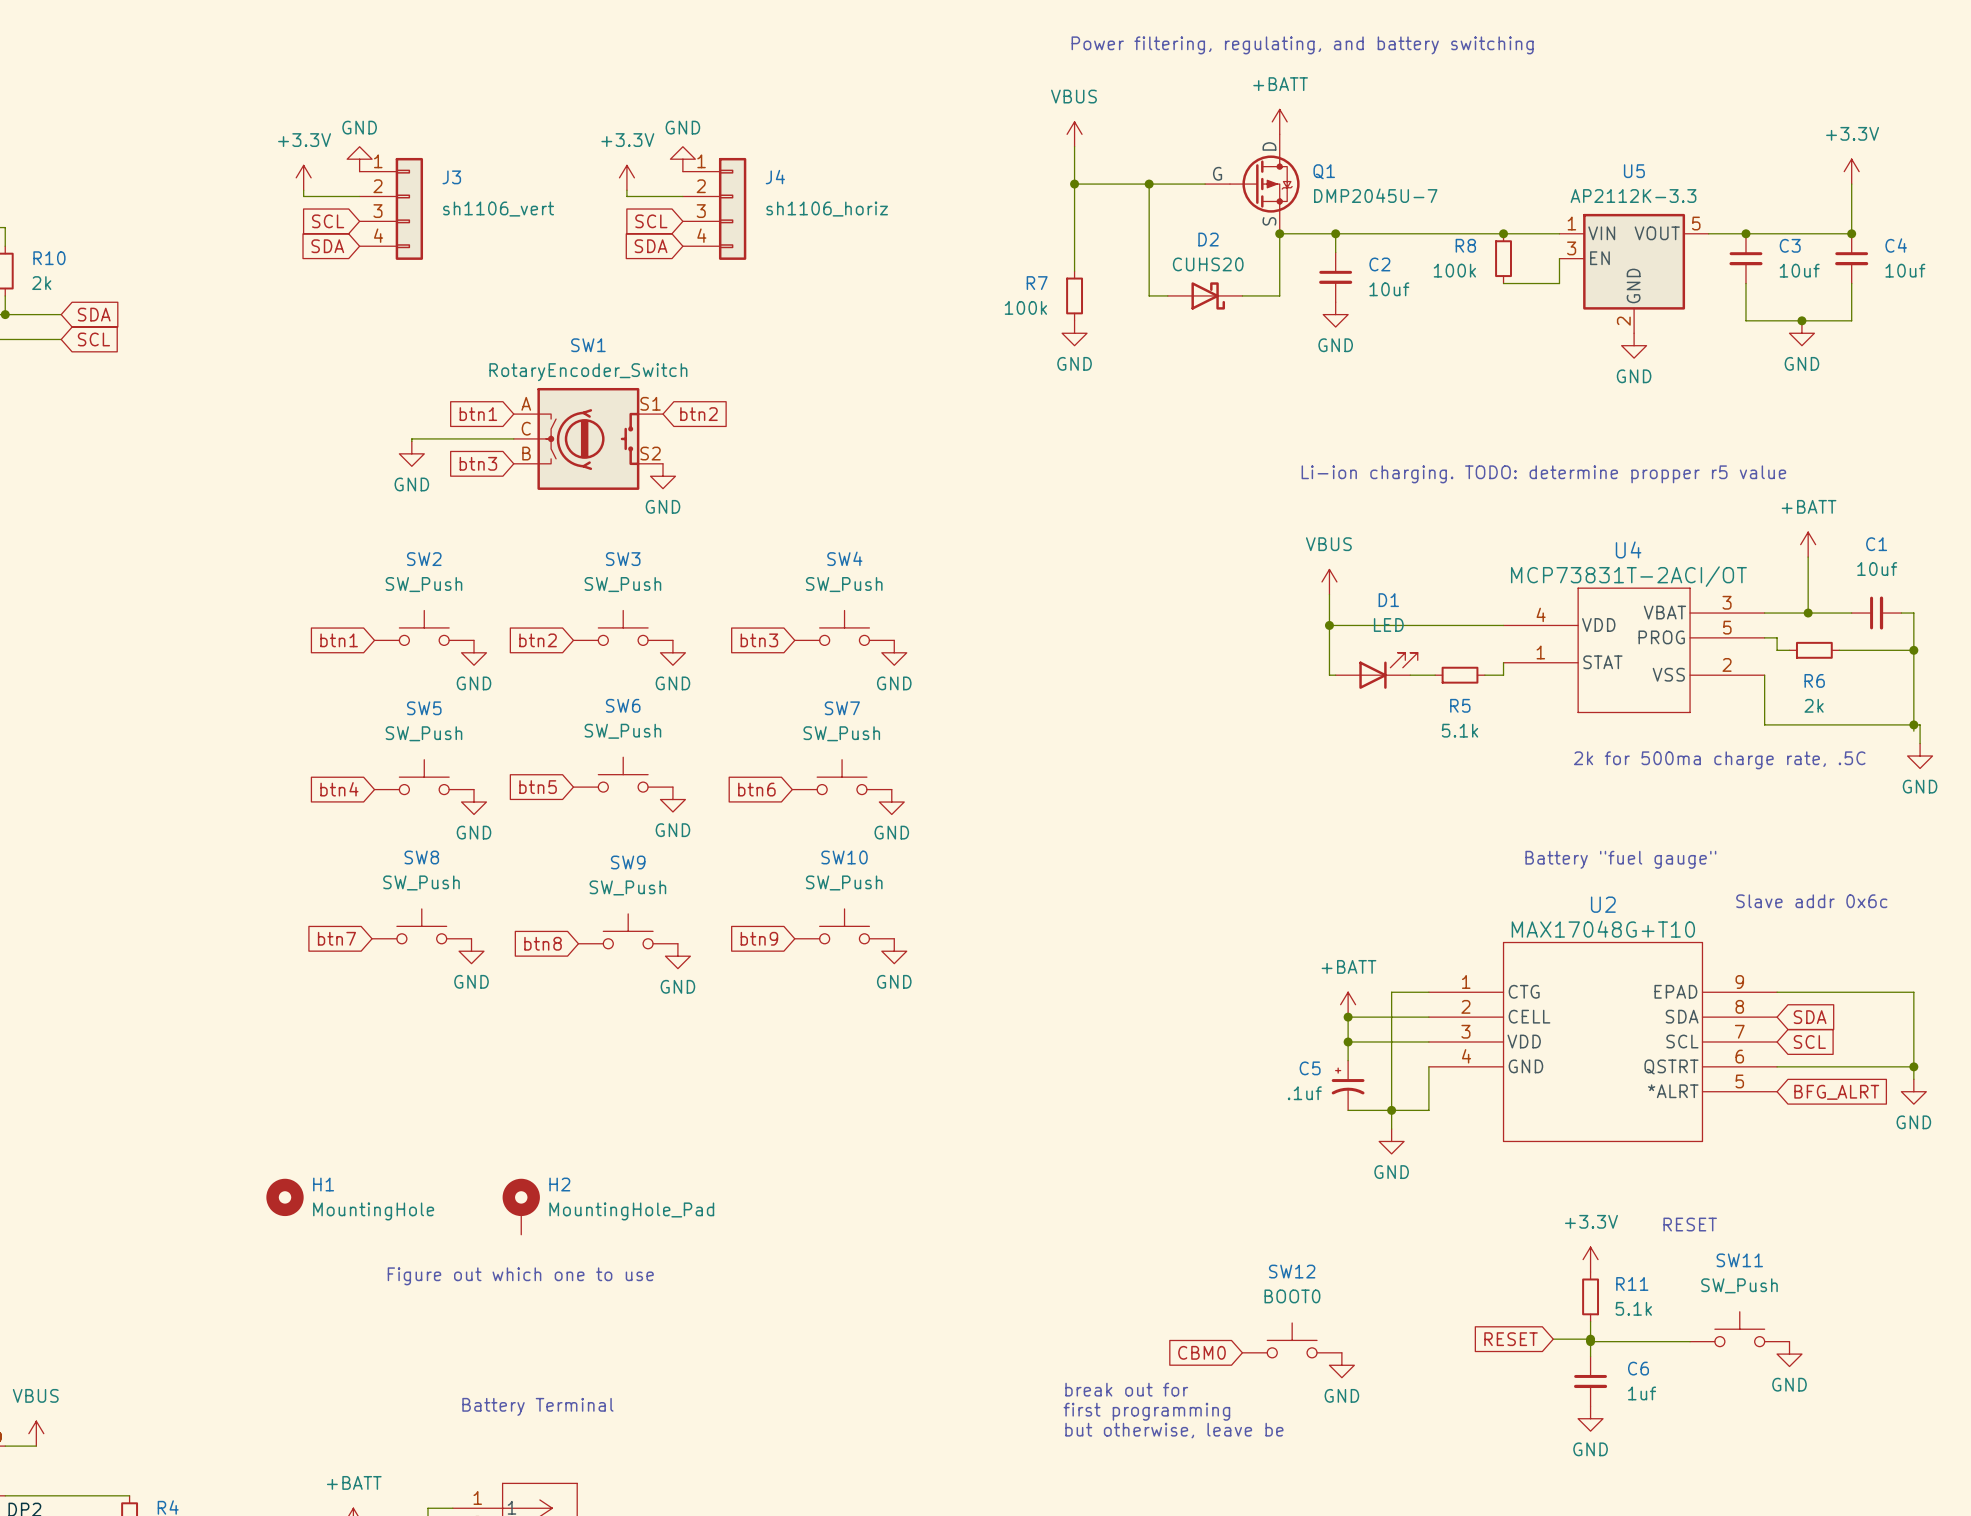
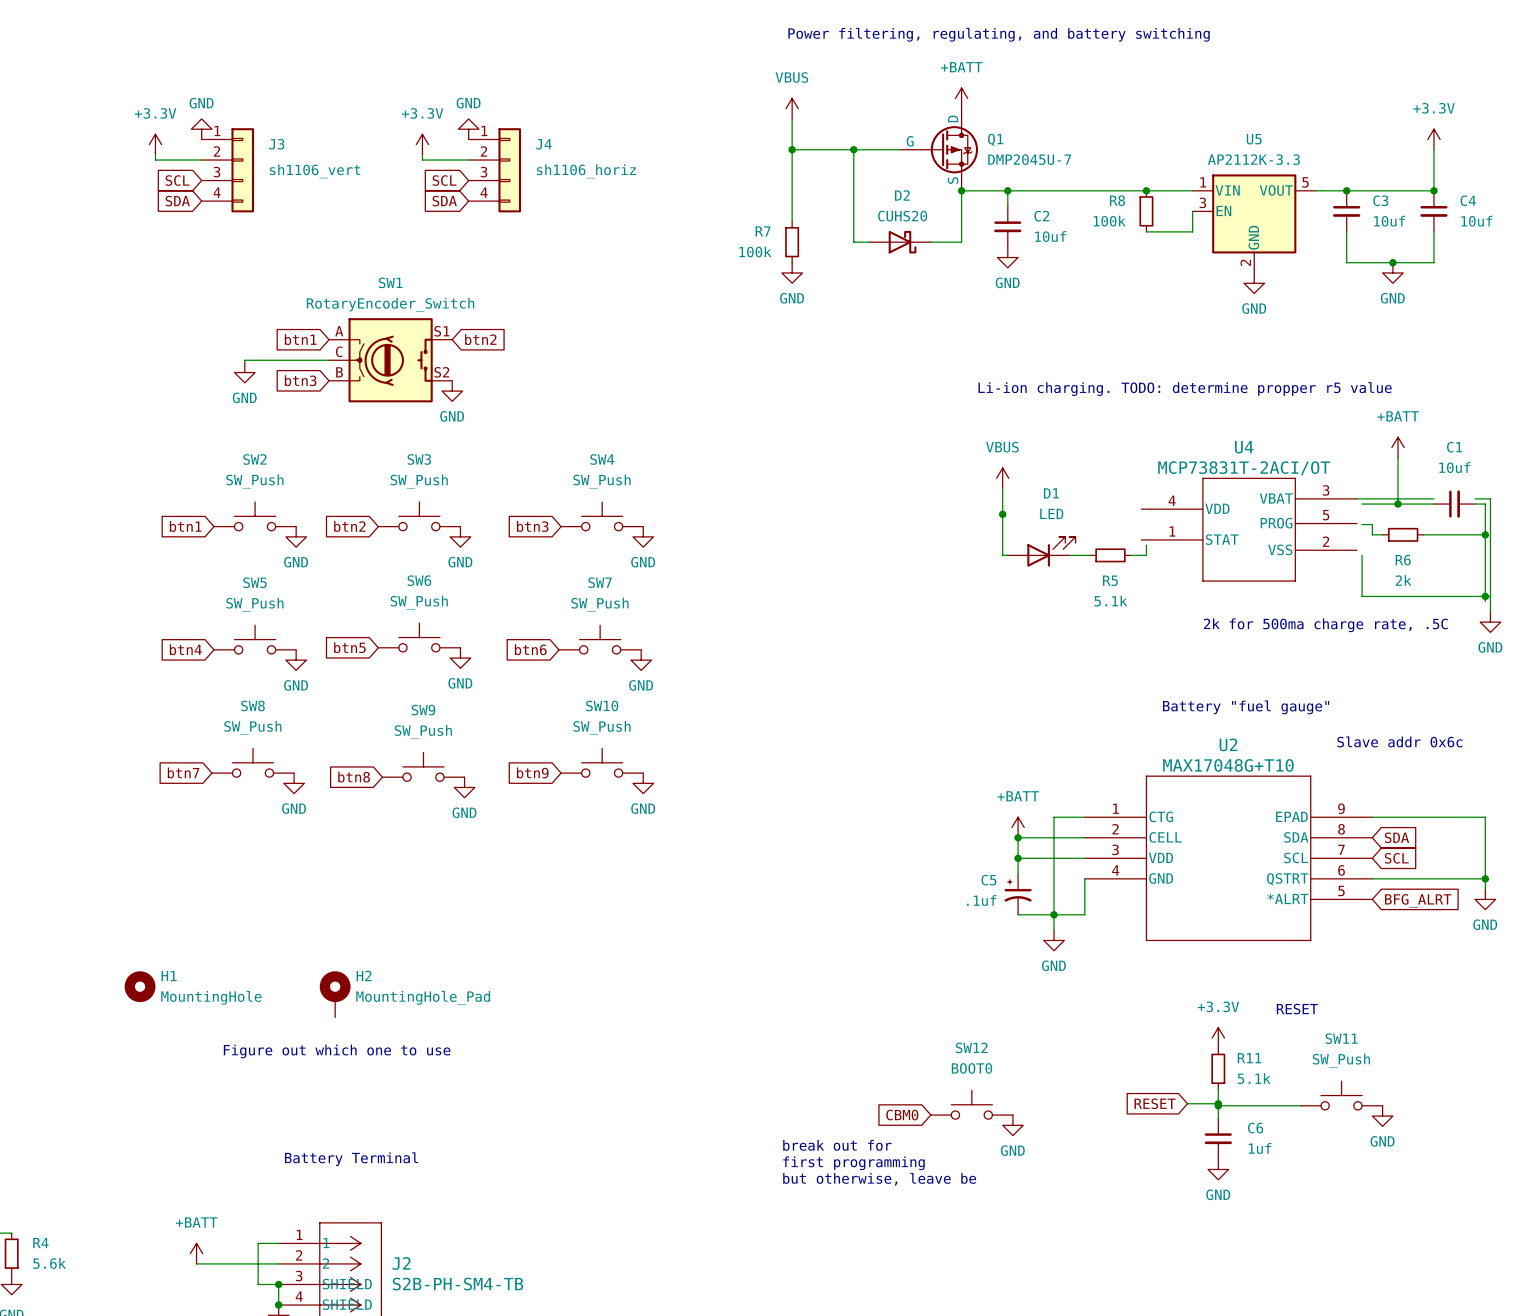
U4 symbol: [1503, 587, 1765, 714] -> [1141, 477, 1357, 582]
wire: none -> (1356, 498) (1433, 498)
wire: none -> (1475, 498) (1490, 498) (1490, 596)
wire: (1329, 625) (1503, 625) -> none

